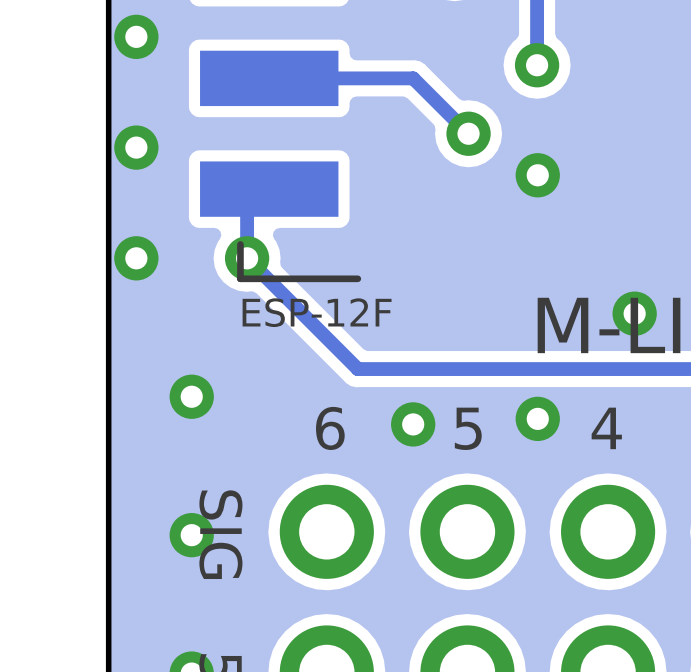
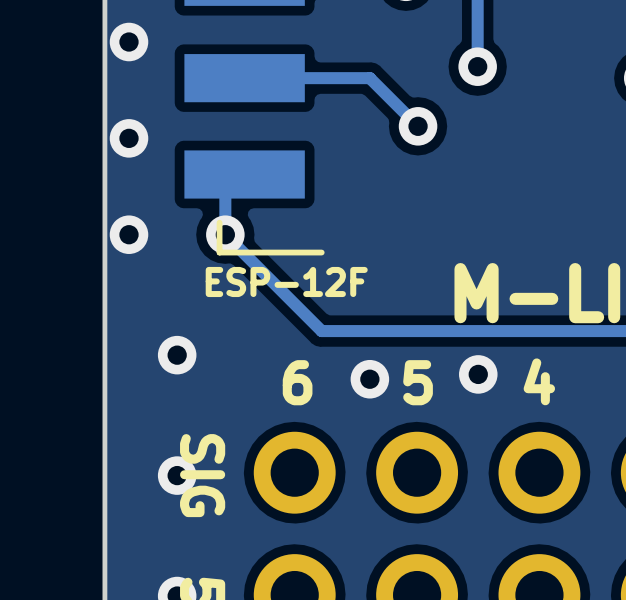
via: (537, 175) -> none
via: (634, 313) -> none

